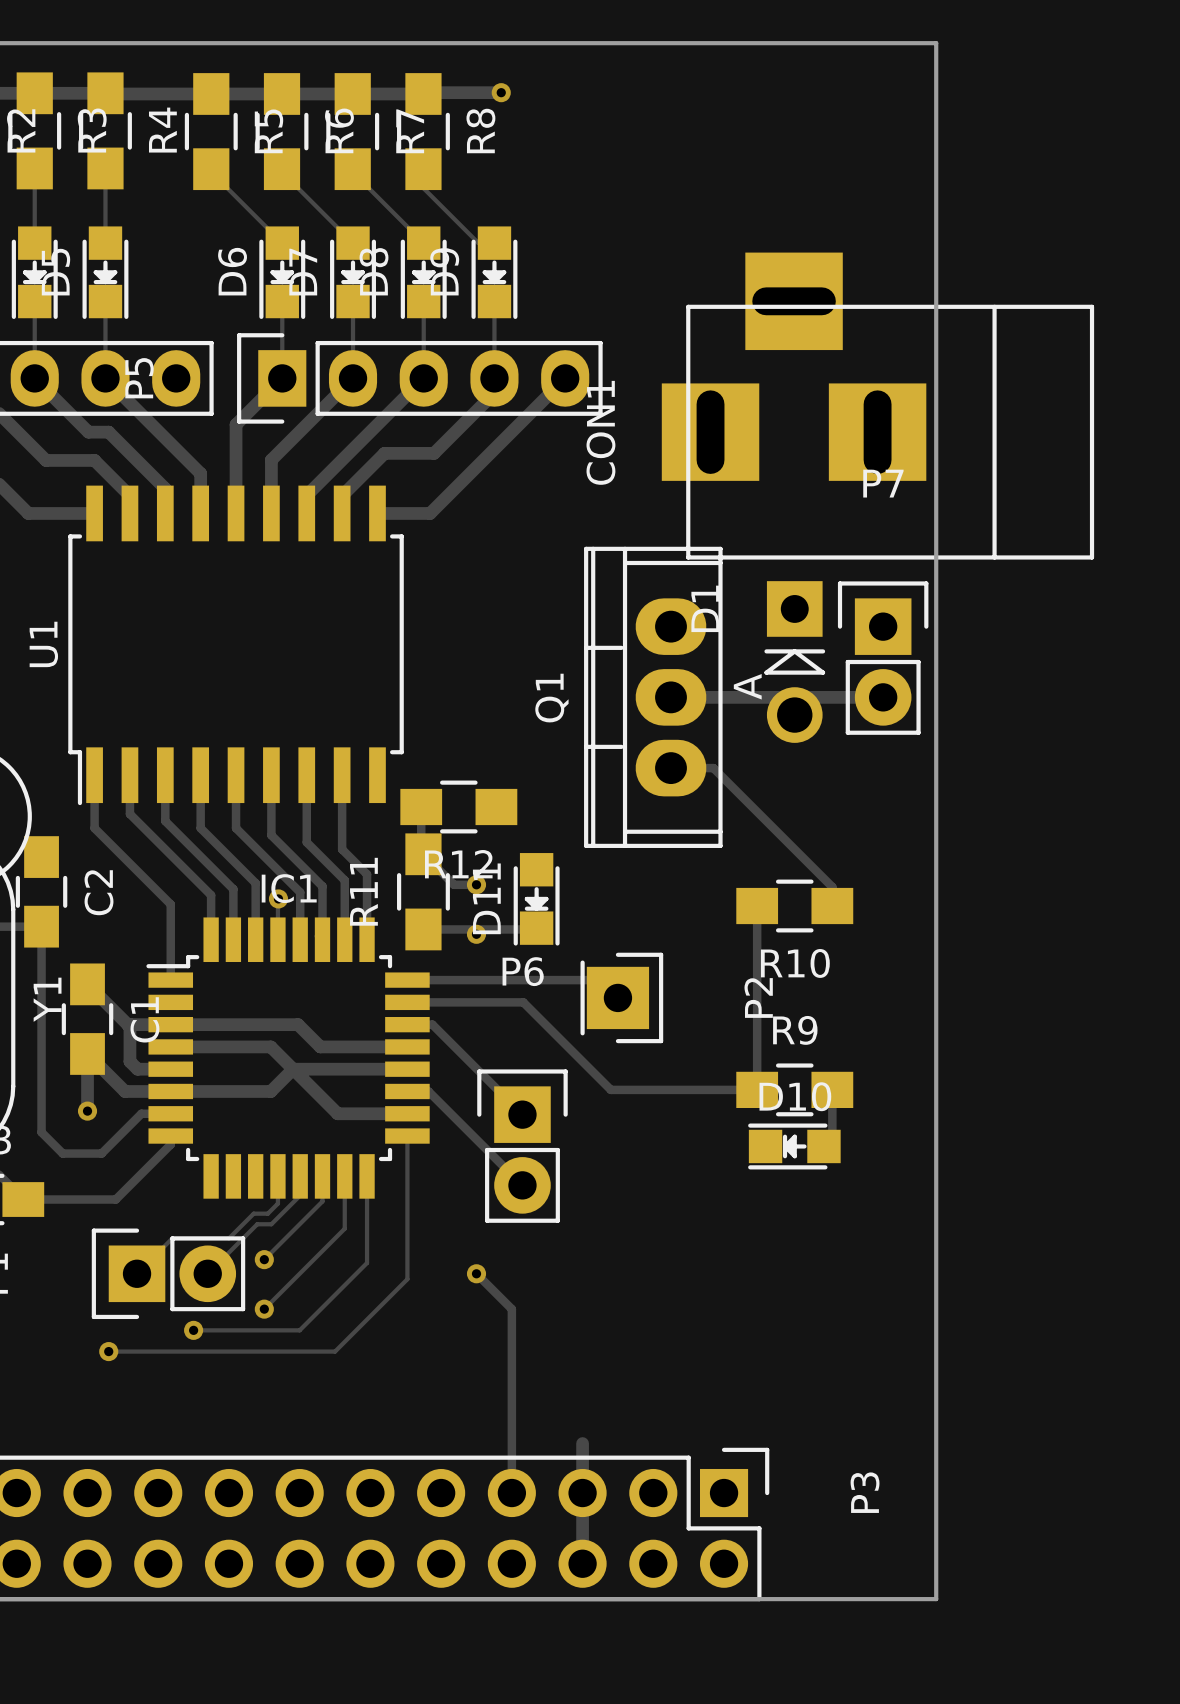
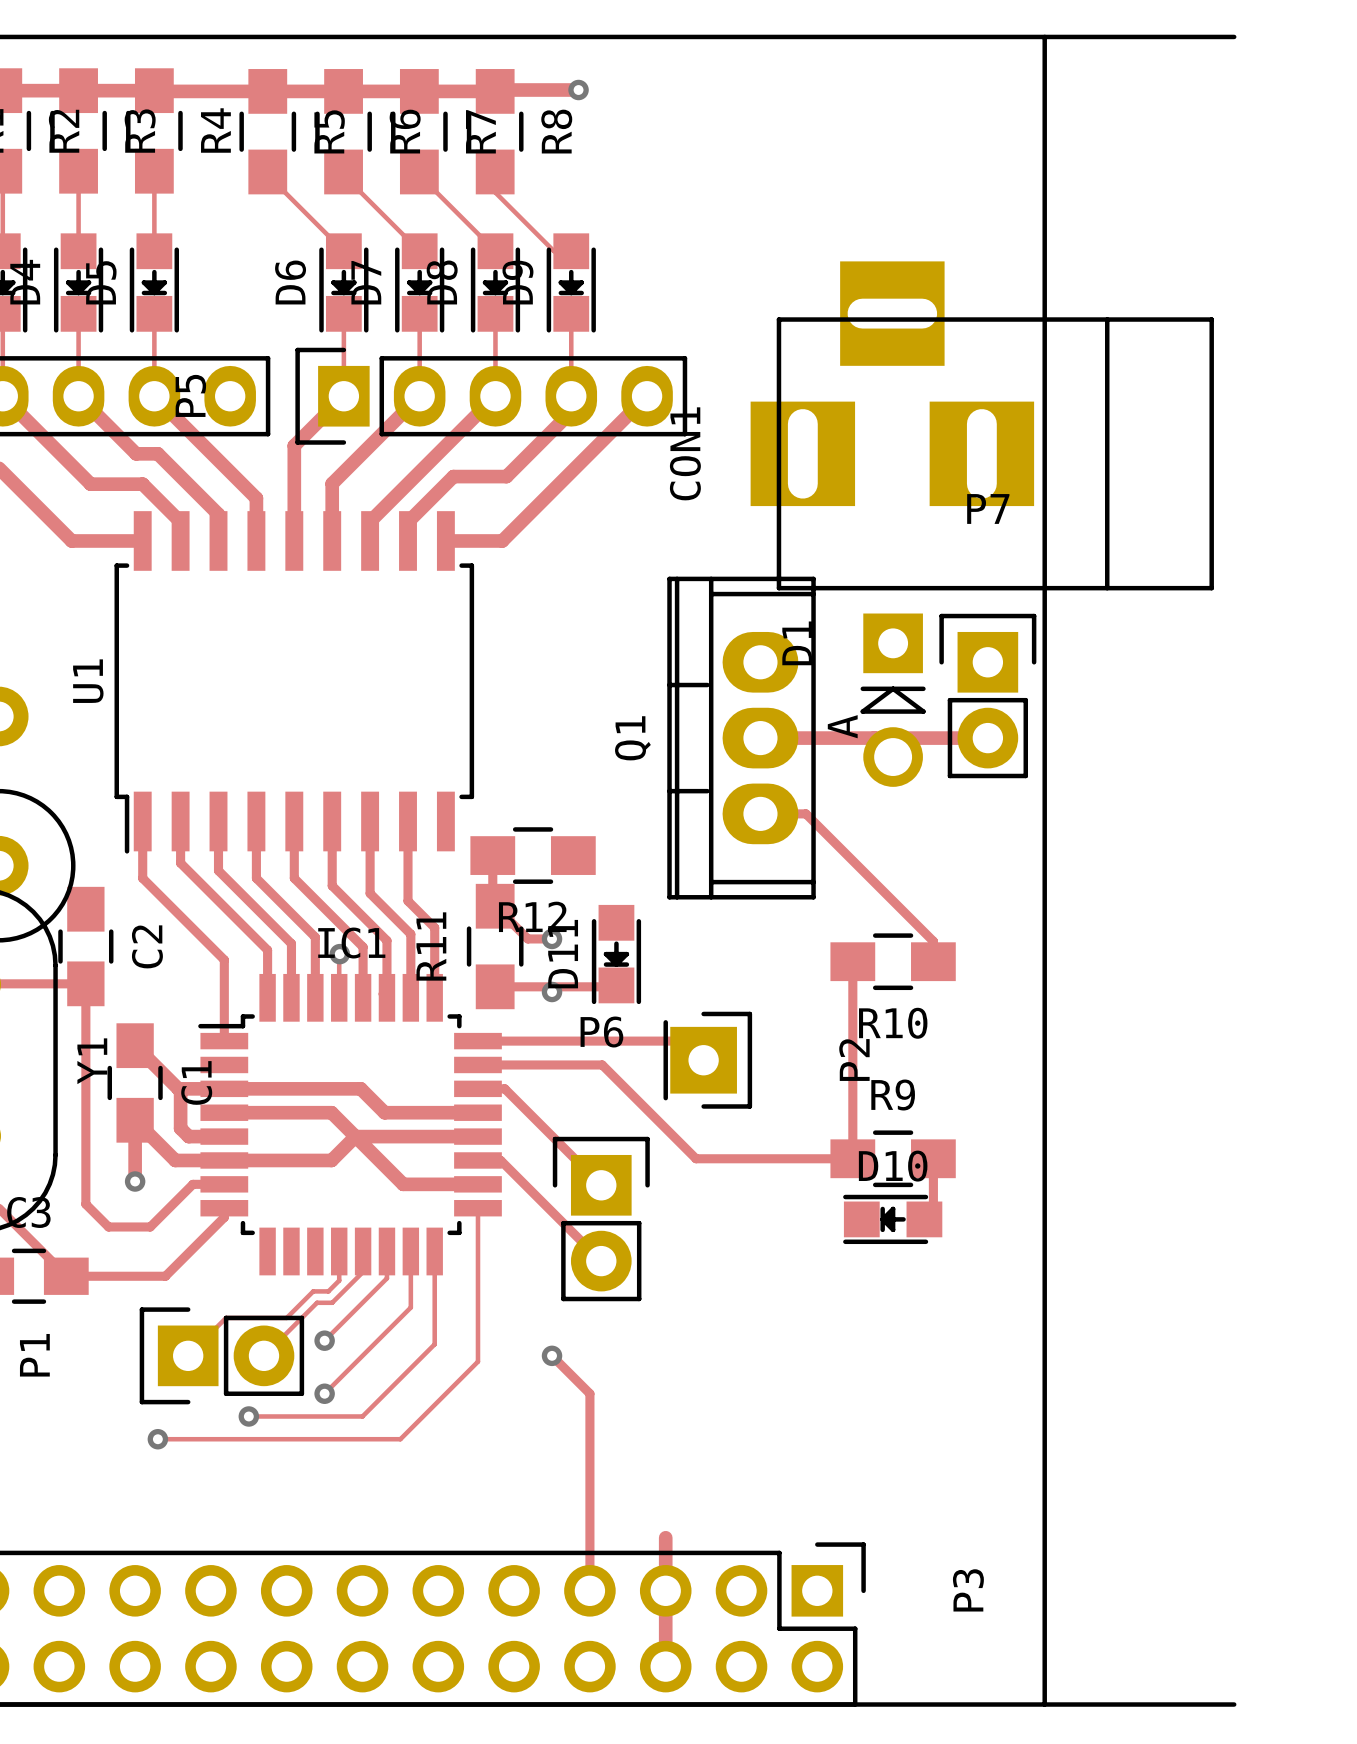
board edge: none -> (1044, 36) (1234, 36)
board edge: none -> (1044, 1704) (1234, 1704)

